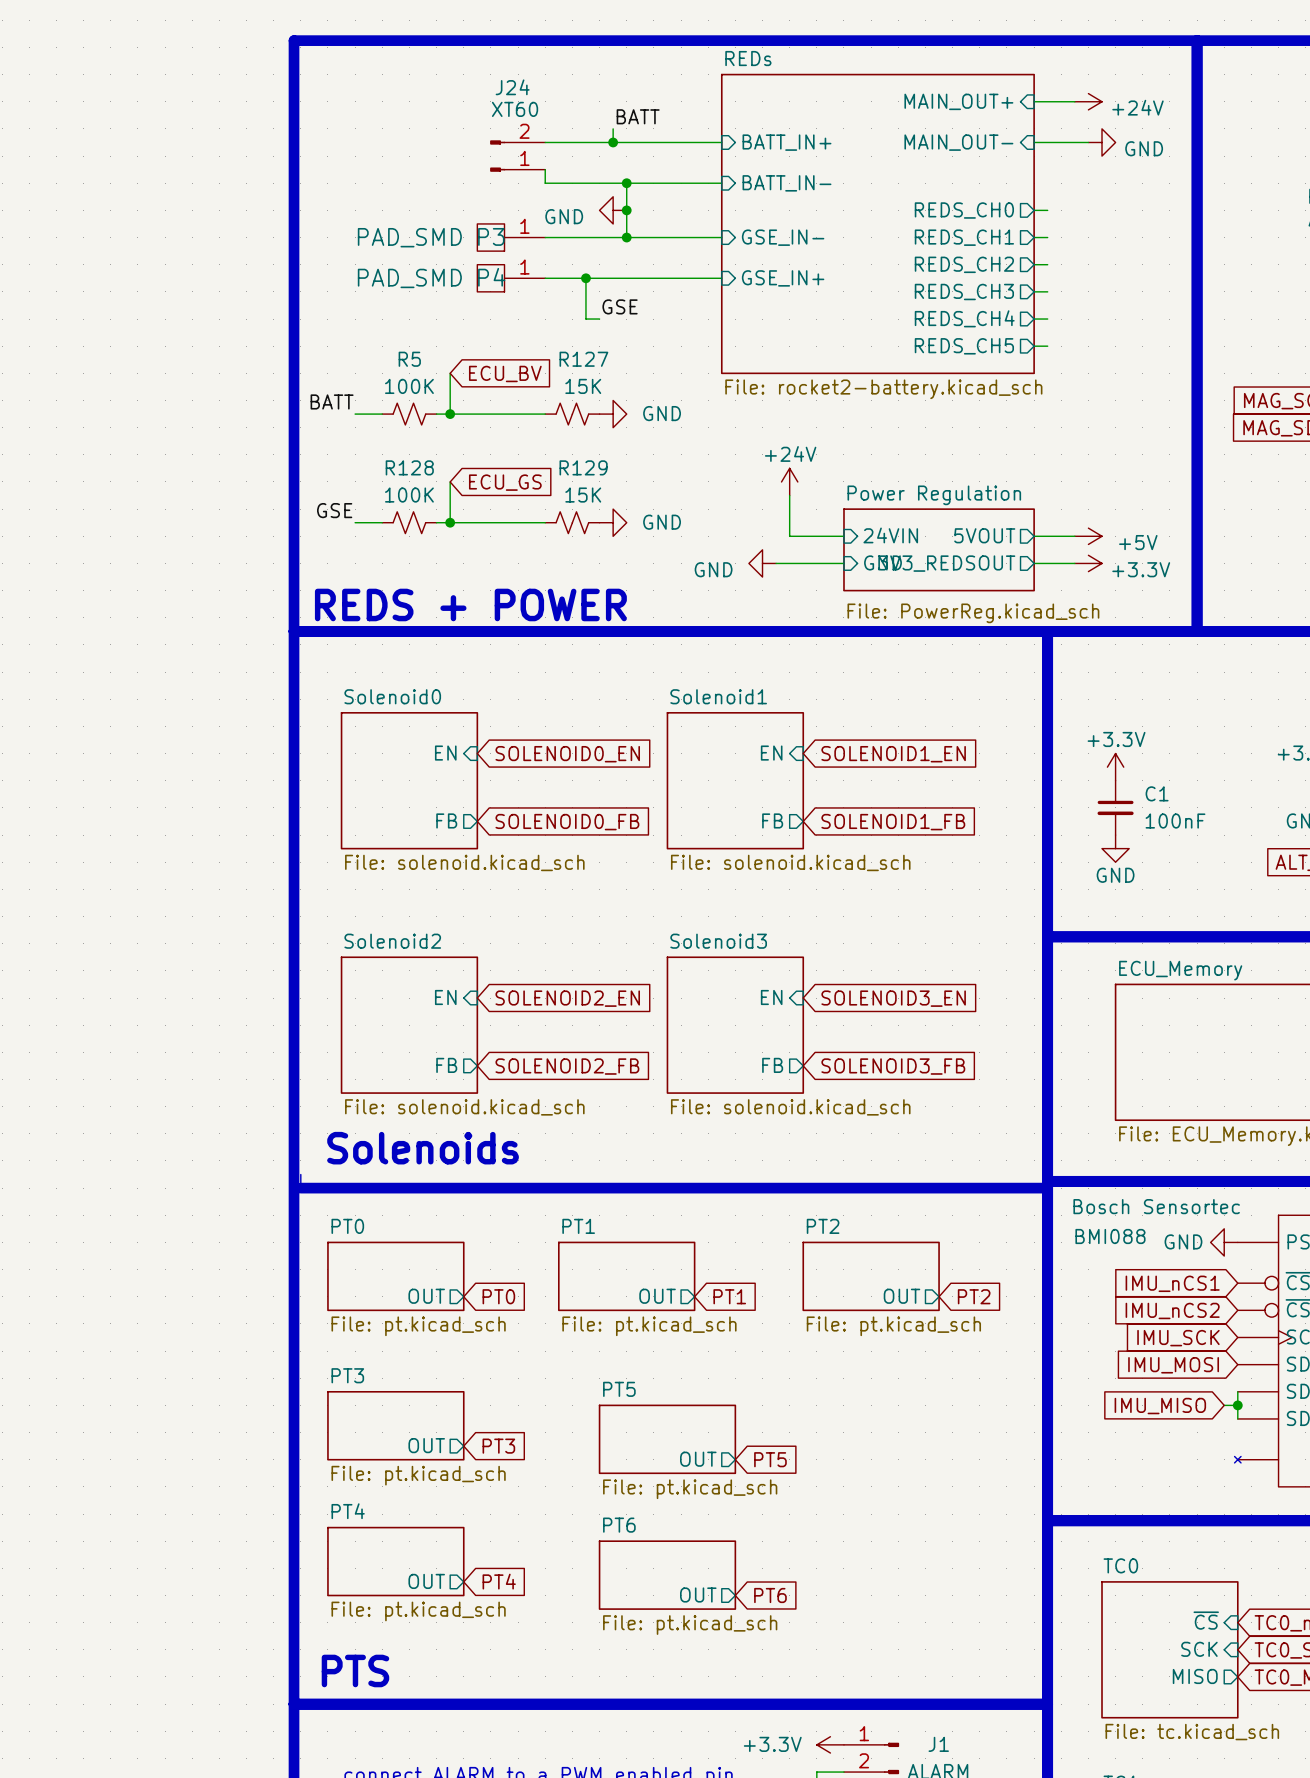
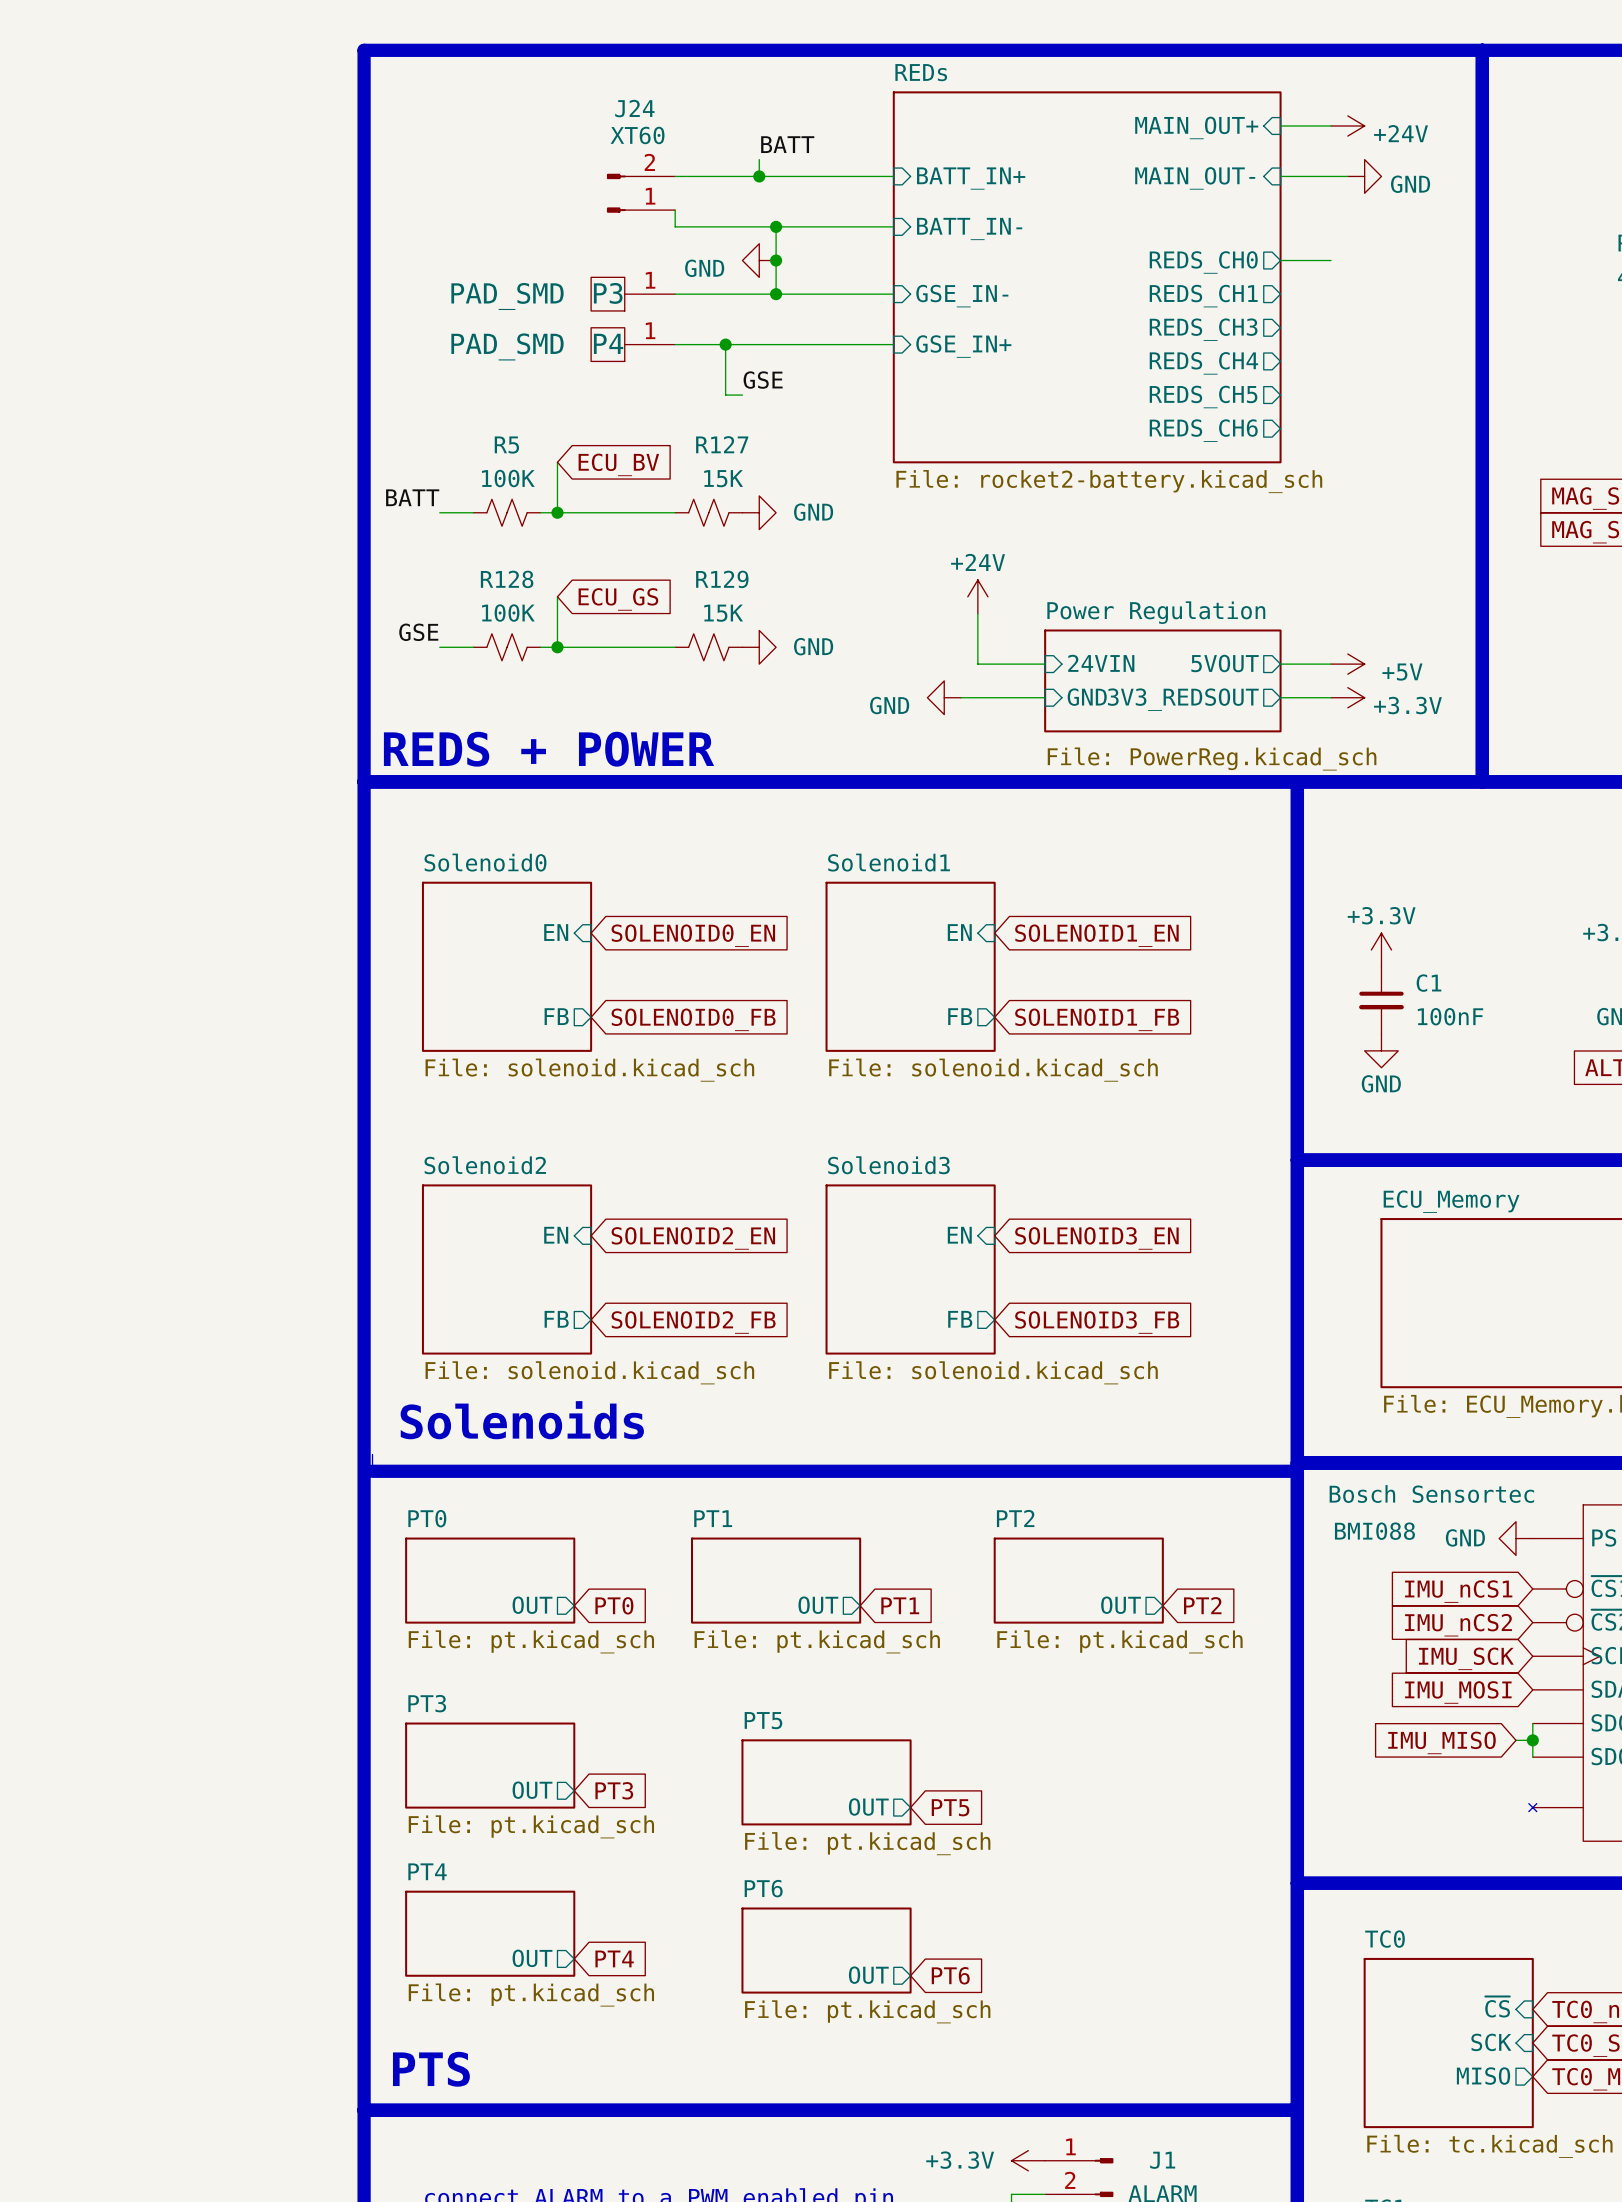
wire: none -> (1297, 260) (1331, 260)
wire: (1034, 237) (1047, 237) -> none
sheet pin: REDS_CH2 (964, 264) -> REDS_CH3 (1203, 329)
wire: (1034, 264) (1047, 264) -> none
wire: (1034, 291) (1047, 291) -> none
sheet pin: REDS_CH3 (964, 292) -> REDS_CH4 (1203, 363)
sheet pin: REDS_CH4 (964, 318) -> REDS_CH5 (1203, 396)
wire: (1034, 319) (1047, 319) -> none
sheet pin: REDS_CH5 (964, 346) -> REDS_CH6 (1203, 430)
wire: (1034, 346) (1047, 346) -> none

